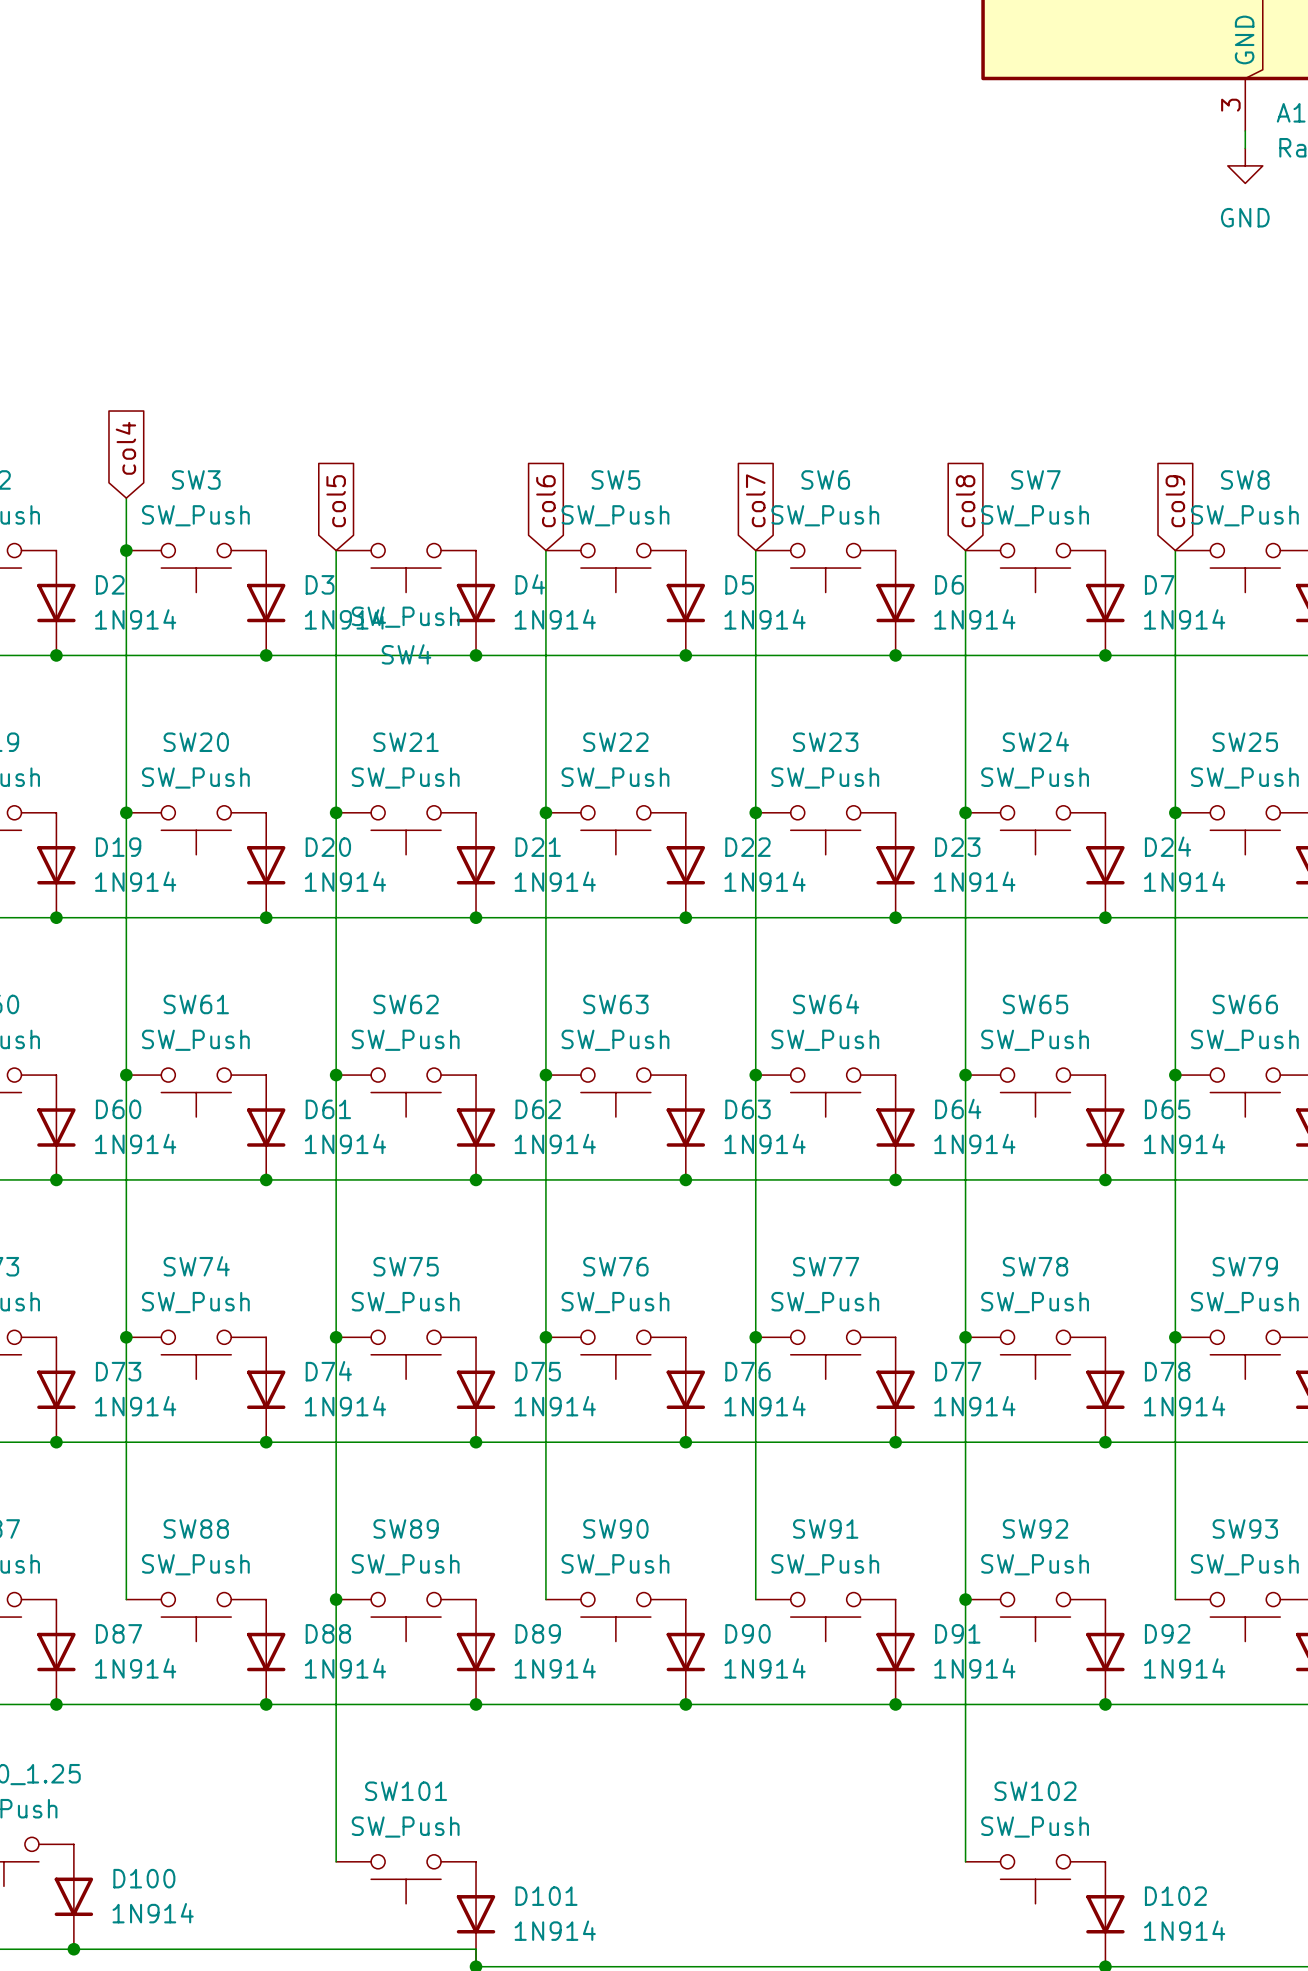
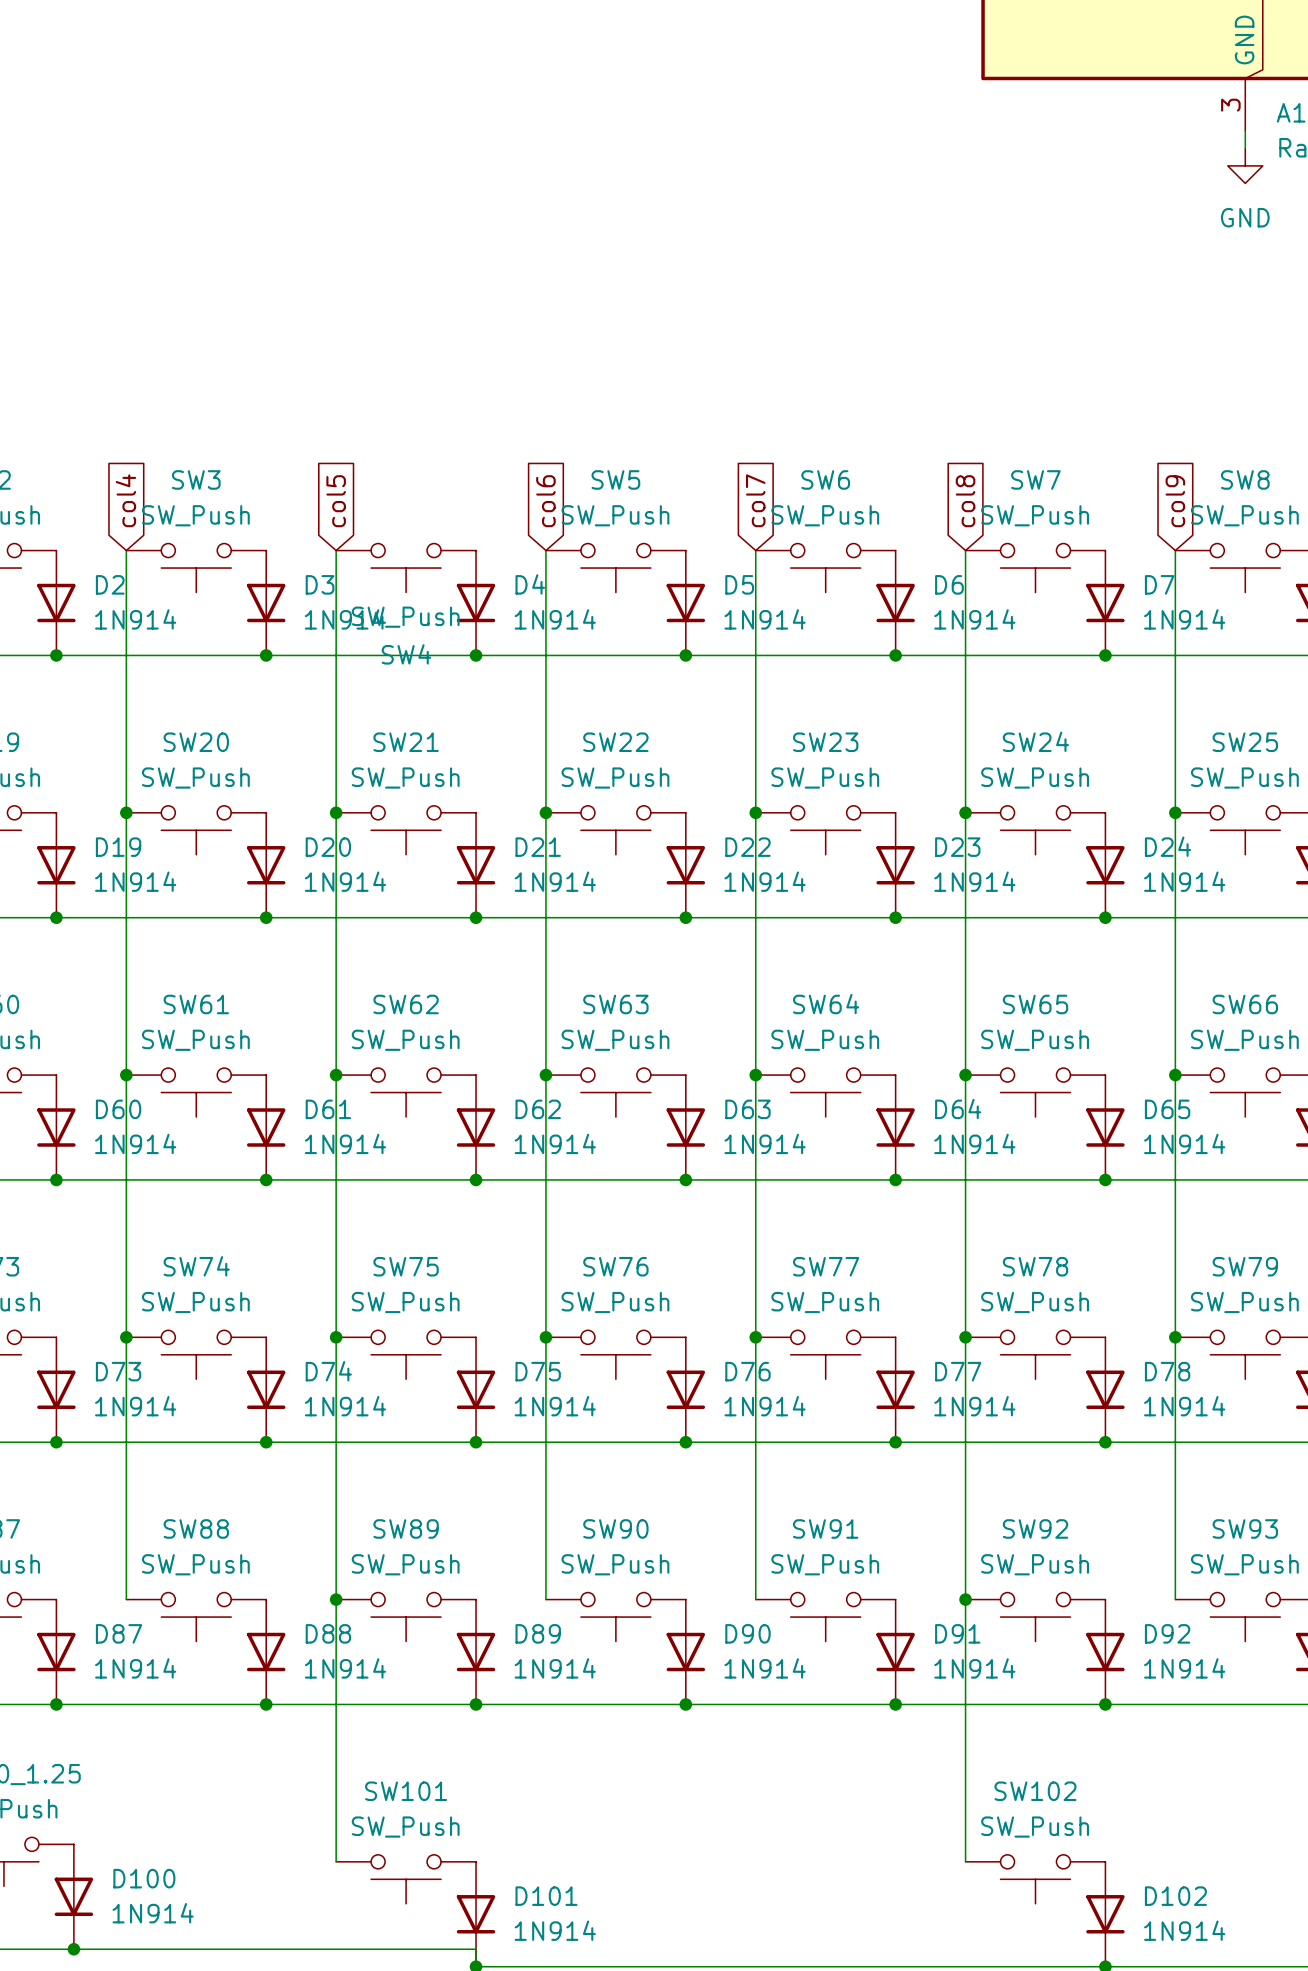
global label position: col4 (125, 448) -> col4 (125, 500)
wire: (126, 498) (126, 550) -> none
junction: (126, 550) -> none

